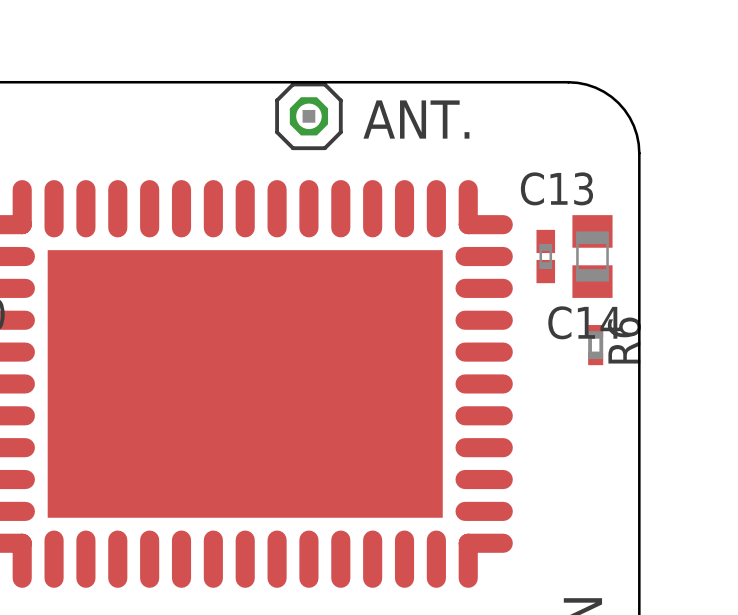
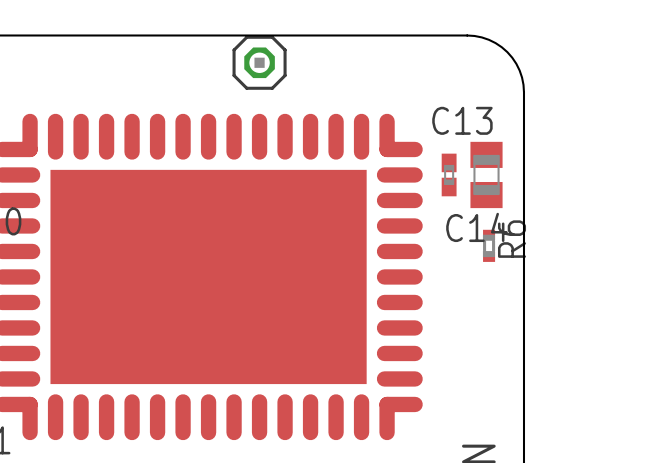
text: ANT. (416, 119) -> none

